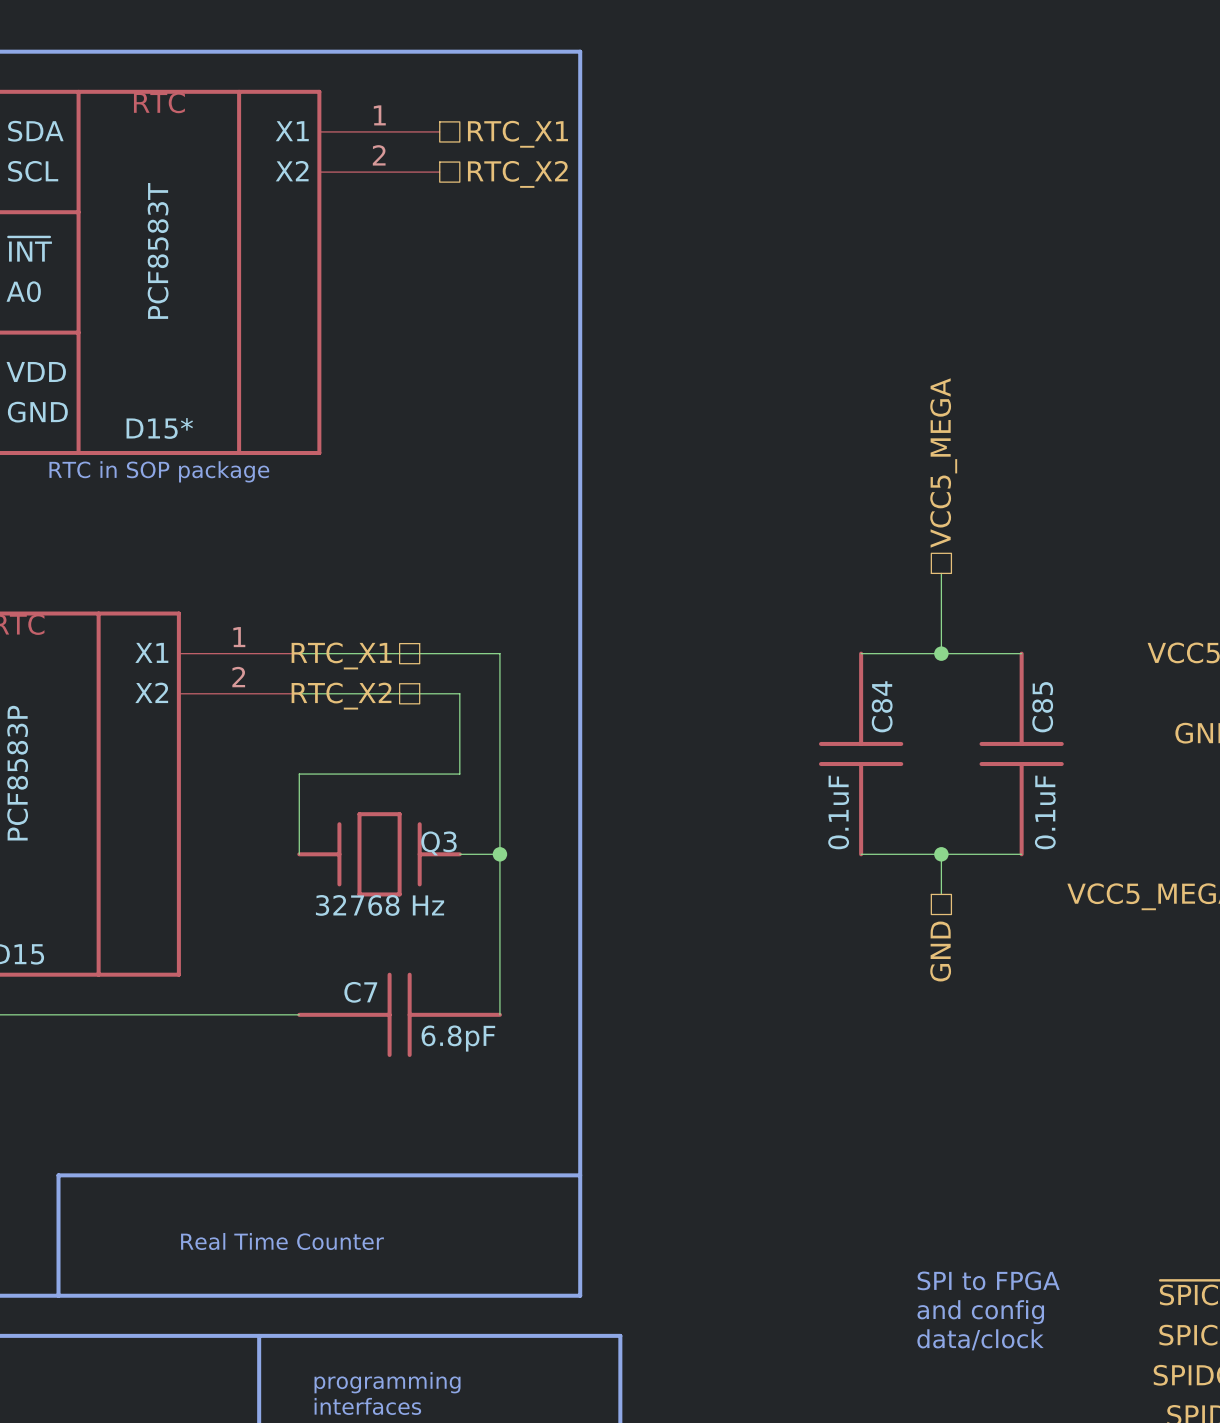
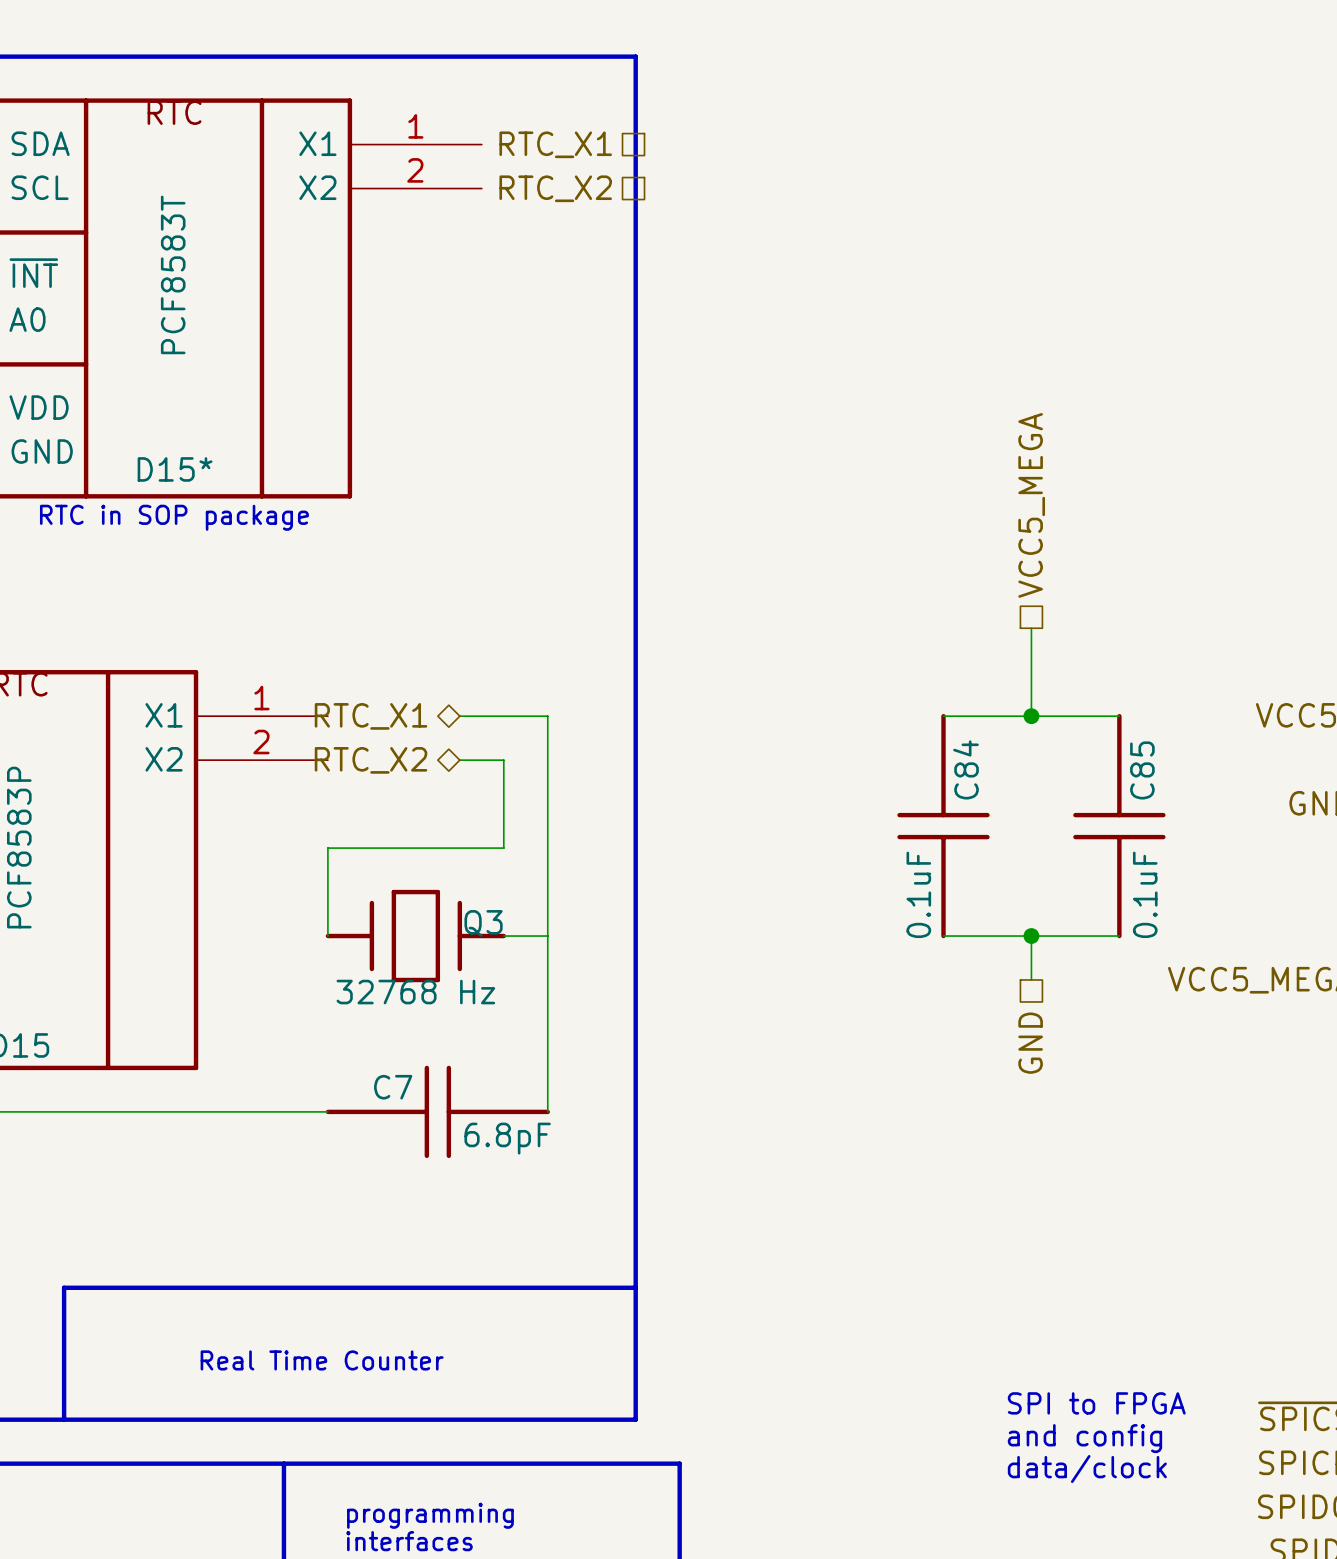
hierarchical label rotation: 0° (517, 134) -> 180° (555, 144)
hierarchical label rotation: 0° (517, 174) -> 180° (555, 188)
wire: (299, 653) (419, 653) -> none
hierarchical label shape: passive (341, 655) -> bidirectional (371, 716)
wire: (299, 693) (419, 693) -> none
hierarchical label shape: passive (341, 696) -> bidirectional (371, 760)
junction: (499, 854) -> none

